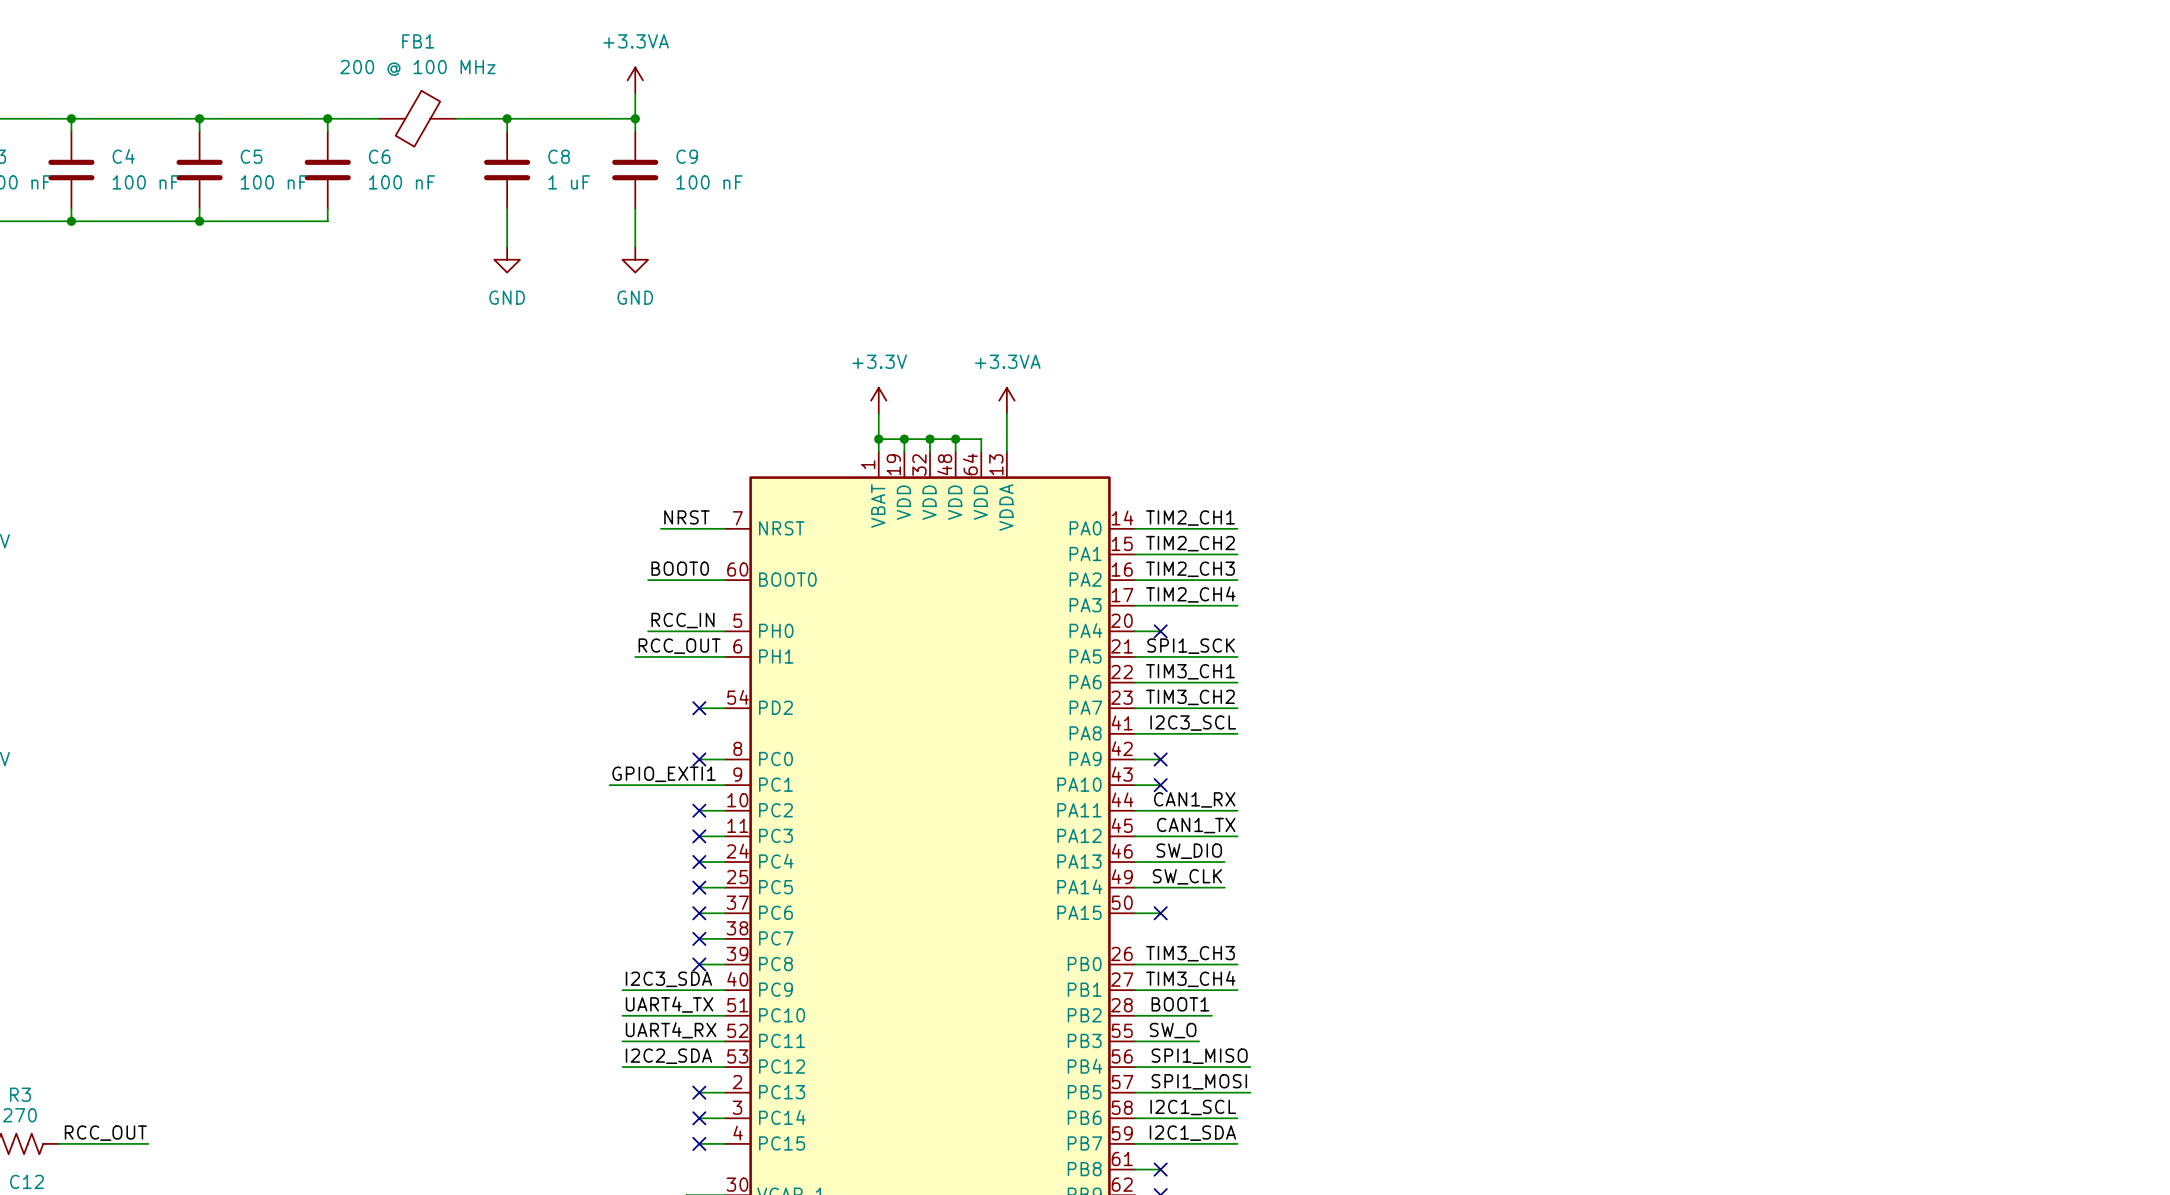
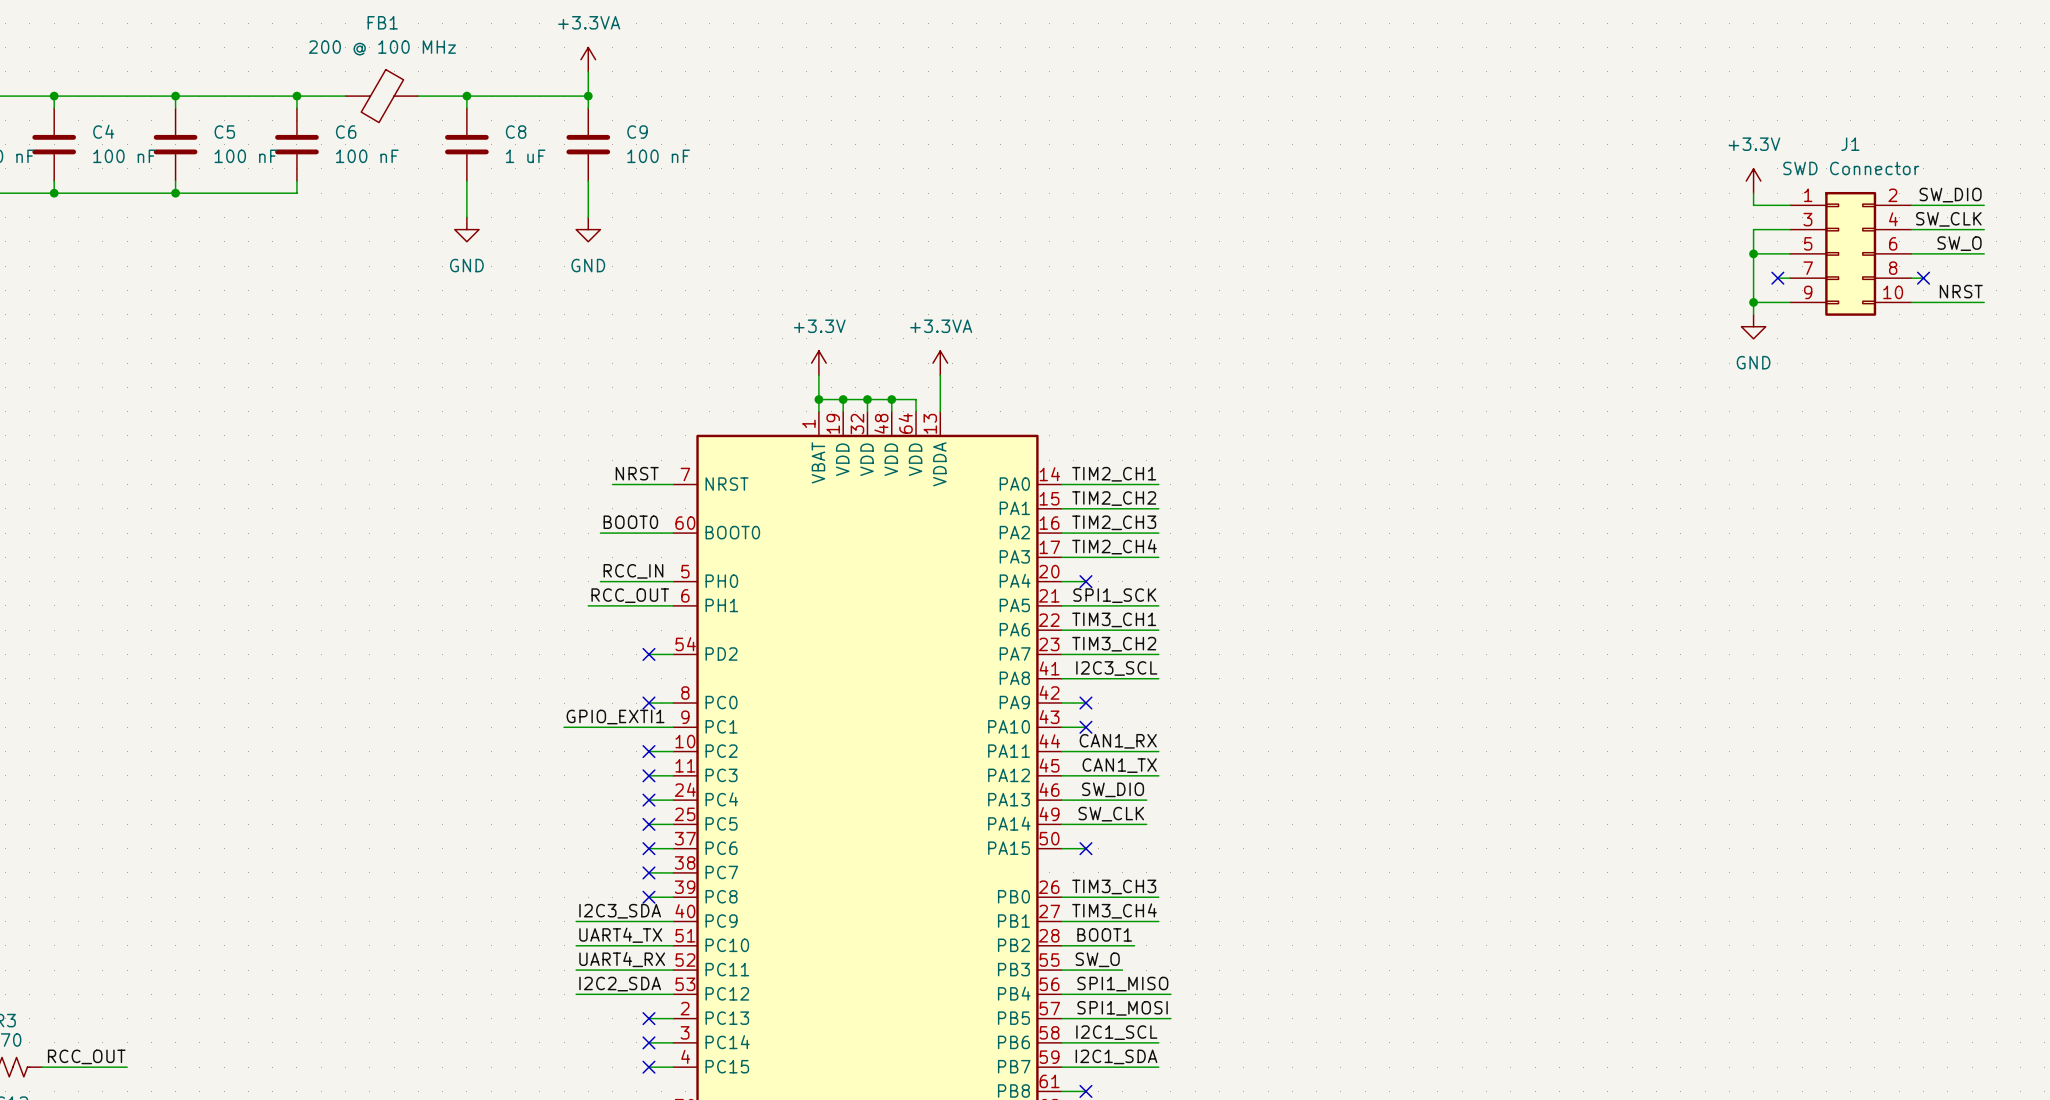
power symbol: none -> +3.3V (1753, 181)
wire: none -> (1753, 193) (1753, 205) (1789, 205)
label: none -> SW_DIO (1950, 195)
wire: none -> (1911, 205) (1984, 205)
label: none -> SW_CLK (1948, 219)
wire: none -> (1789, 229) (1753, 229) (1753, 314)
wire: none -> (1911, 229) (1984, 229)
label: none -> SW_O (1959, 243)
wire: none -> (1753, 253) (1789, 253)
junction: none -> (1753, 253)
J1: none -> SWD Connector (1850, 253)
wire: none -> (1911, 253) (1984, 253)
wire: none -> (1777, 278) (1789, 278)
no-connect mark: none -> (1777, 278)
wire: none -> (1911, 278) (1923, 278)
no-connect mark: none -> (1923, 278)
label: none -> NRST (1961, 291)
wire: none -> (1753, 302) (1789, 302)
junction: none -> (1753, 302)
wire: none -> (1911, 302) (1984, 302)
power symbol: none -> GND (1753, 326)

